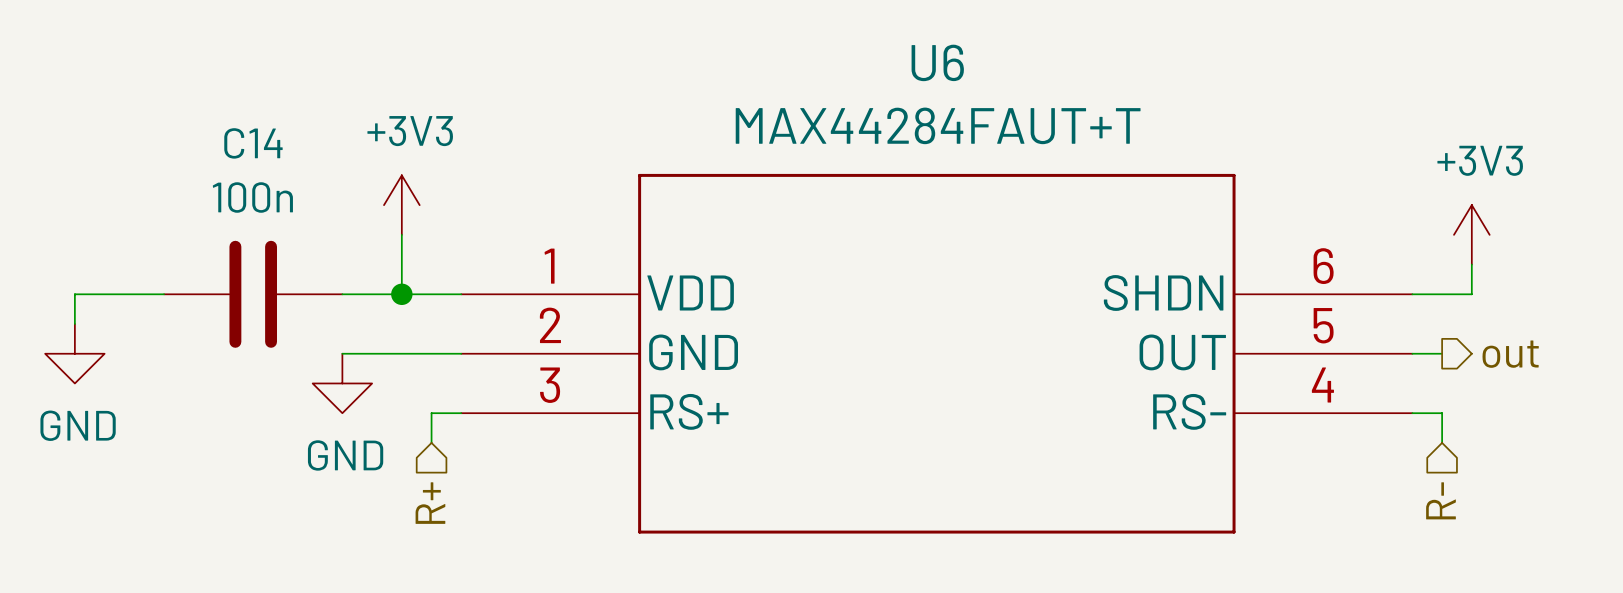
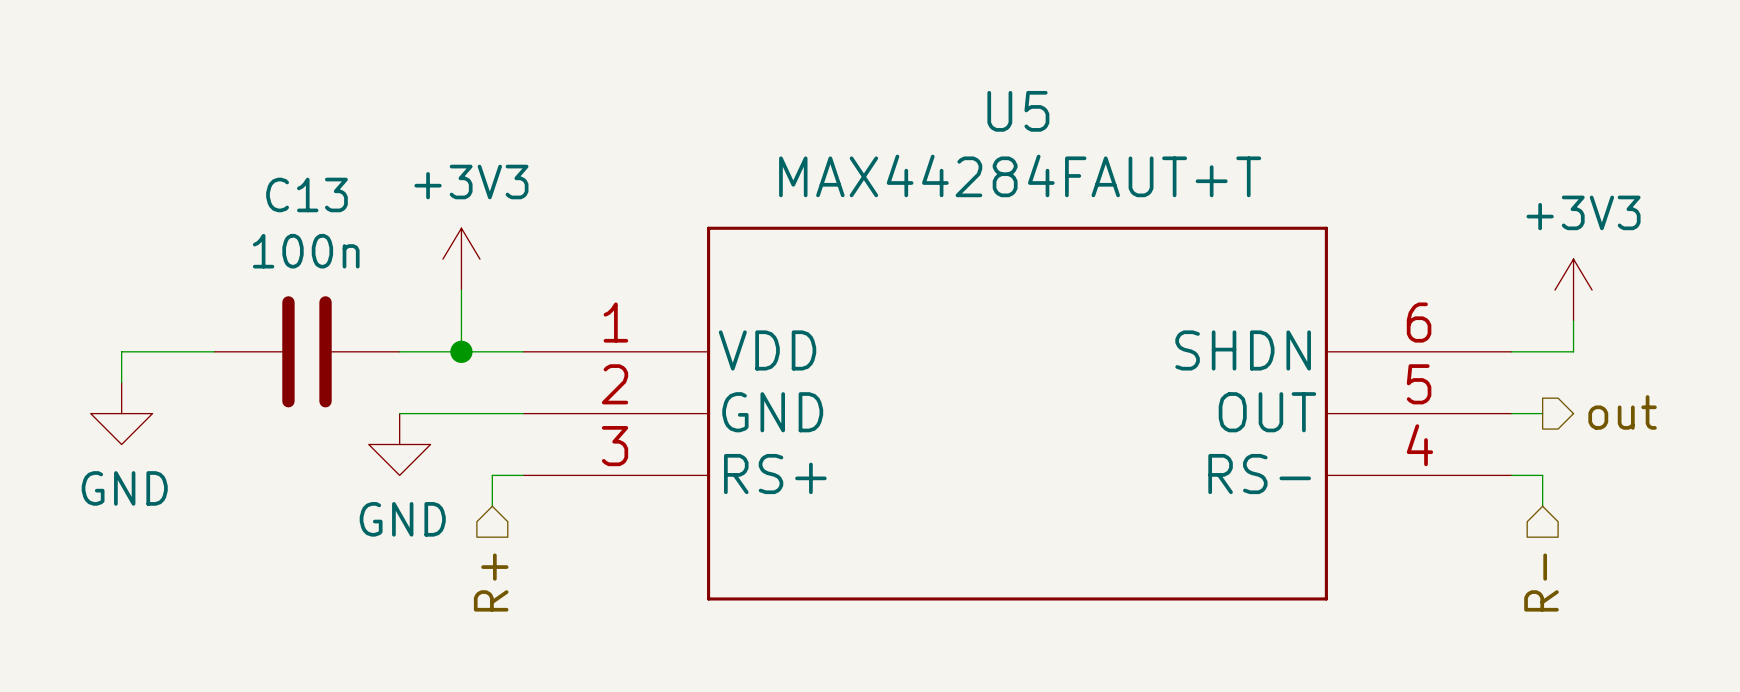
U6 name: U6 (937, 62) -> U5 (1018, 111)
C14 name: C14 (253, 143) -> C13 (306, 194)

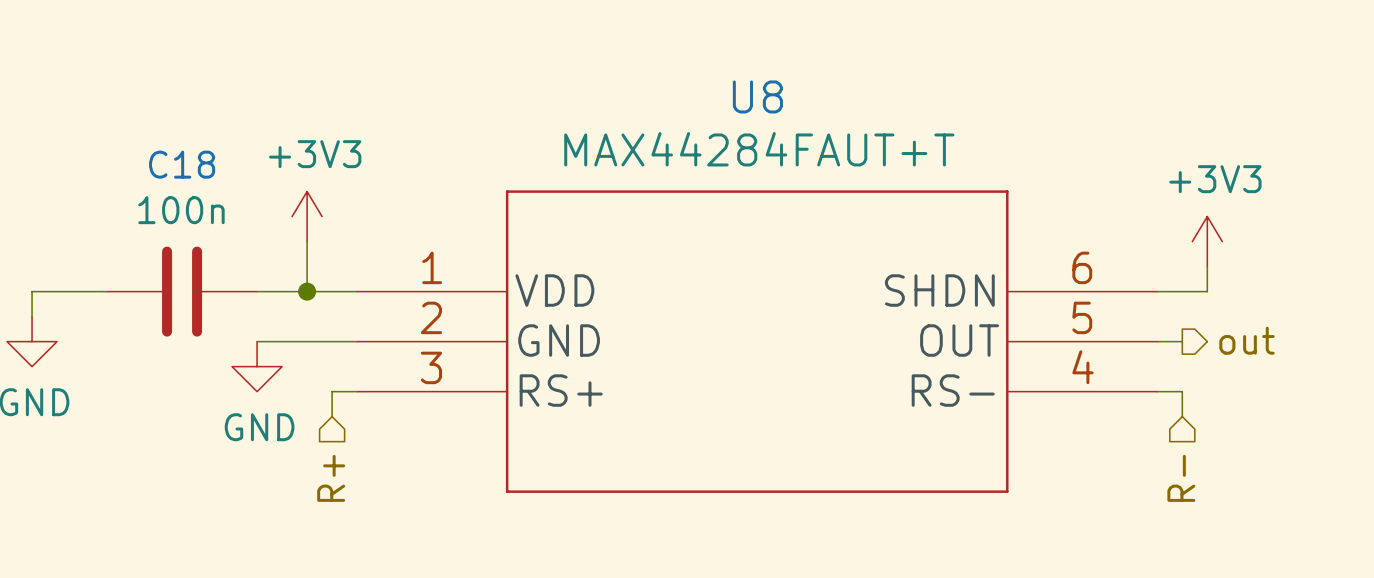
U5 name: U5 (1018, 111) -> U8 (757, 96)
C13 name: C13 (306, 194) -> C18 (182, 164)

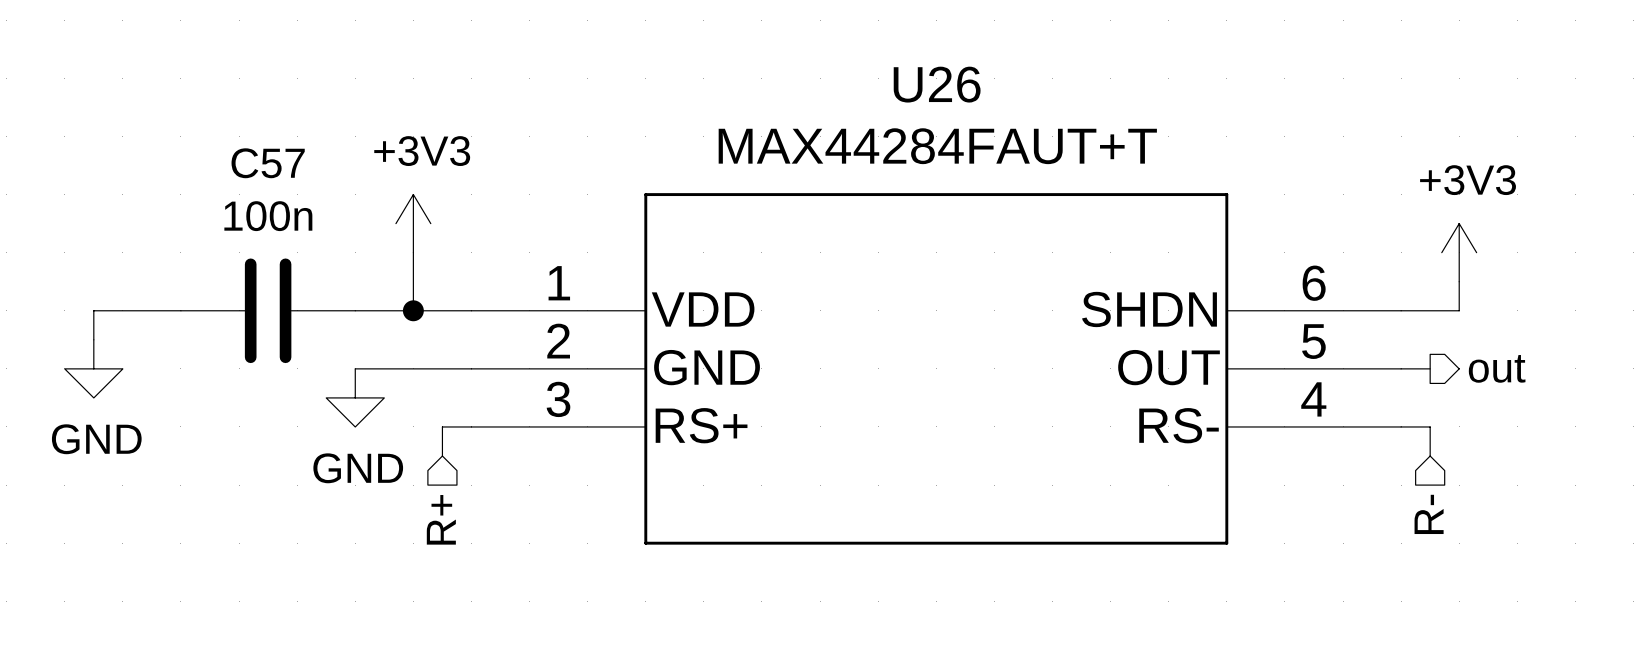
U8 name: U8 (757, 96) -> U26 (937, 84)
C18 name: C18 (182, 164) -> C57 (268, 163)

